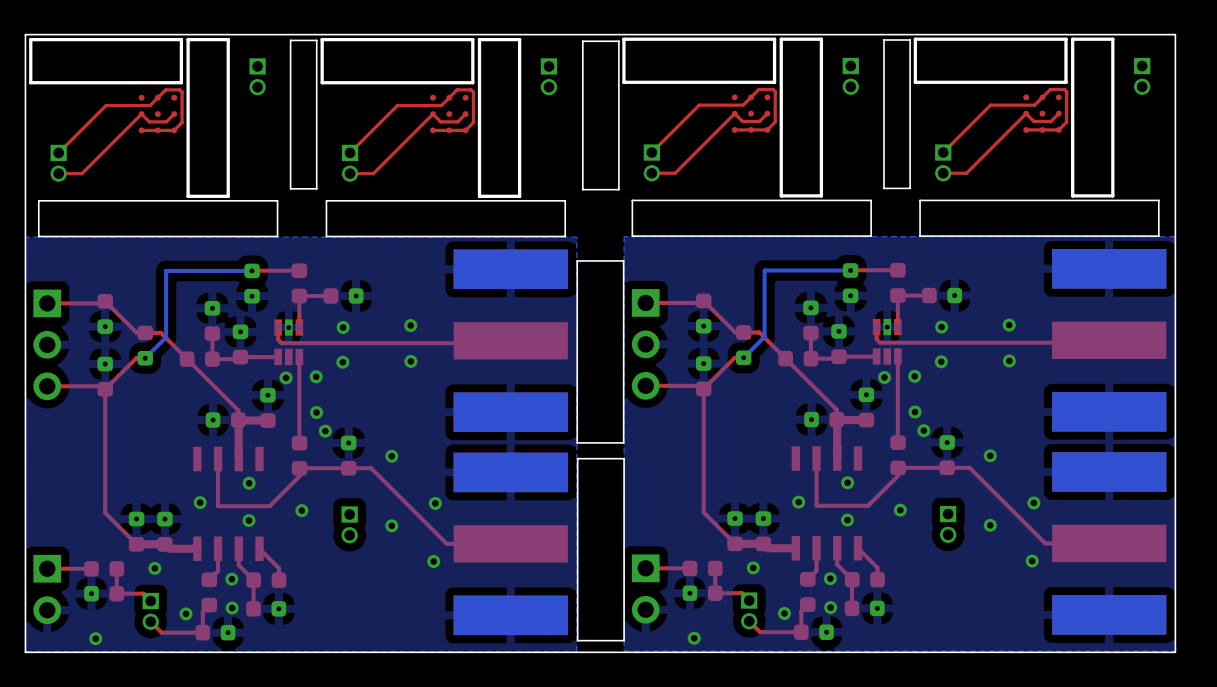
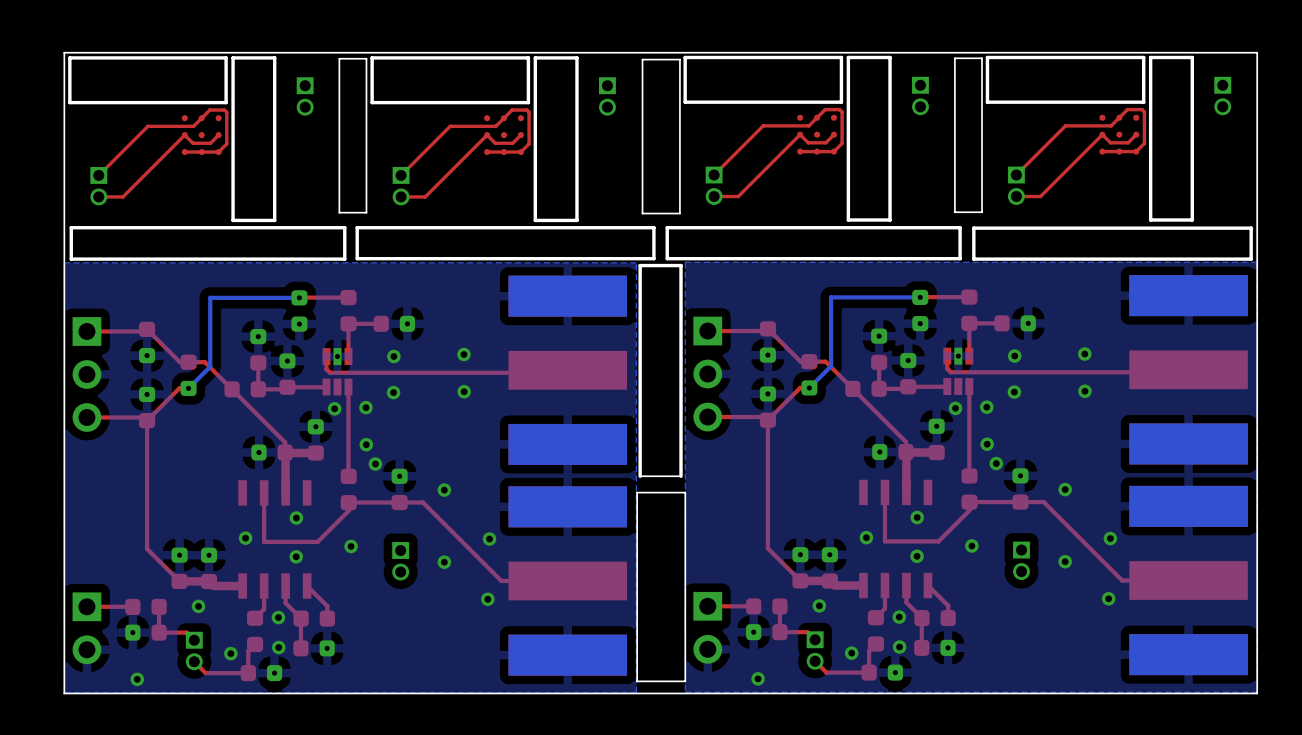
board edge: (277, 200) (38, 200) (38, 236) (277, 236) (277, 200) -> (344, 227) (344, 259) (71, 259) (71, 227) (344, 227)
board edge: (565, 200) (326, 200) (326, 236) (565, 236) (565, 200) -> (653, 227) (653, 258) (357, 258) (357, 227) (653, 227)
board edge: (871, 200) (632, 200) (632, 236) (871, 236) (871, 200) -> (960, 227) (960, 258) (667, 258) (667, 227) (960, 227)
board edge: (1158, 200) (920, 200) (920, 236) (1158, 236) (1158, 200) -> (1251, 228) (1251, 259) (973, 259) (973, 228) (1251, 228)
board edge: (619, 442) (623, 442) (623, 260) (577, 260) (577, 442) (580, 442) -> (681, 476) (681, 265) (640, 265) (640, 476)

